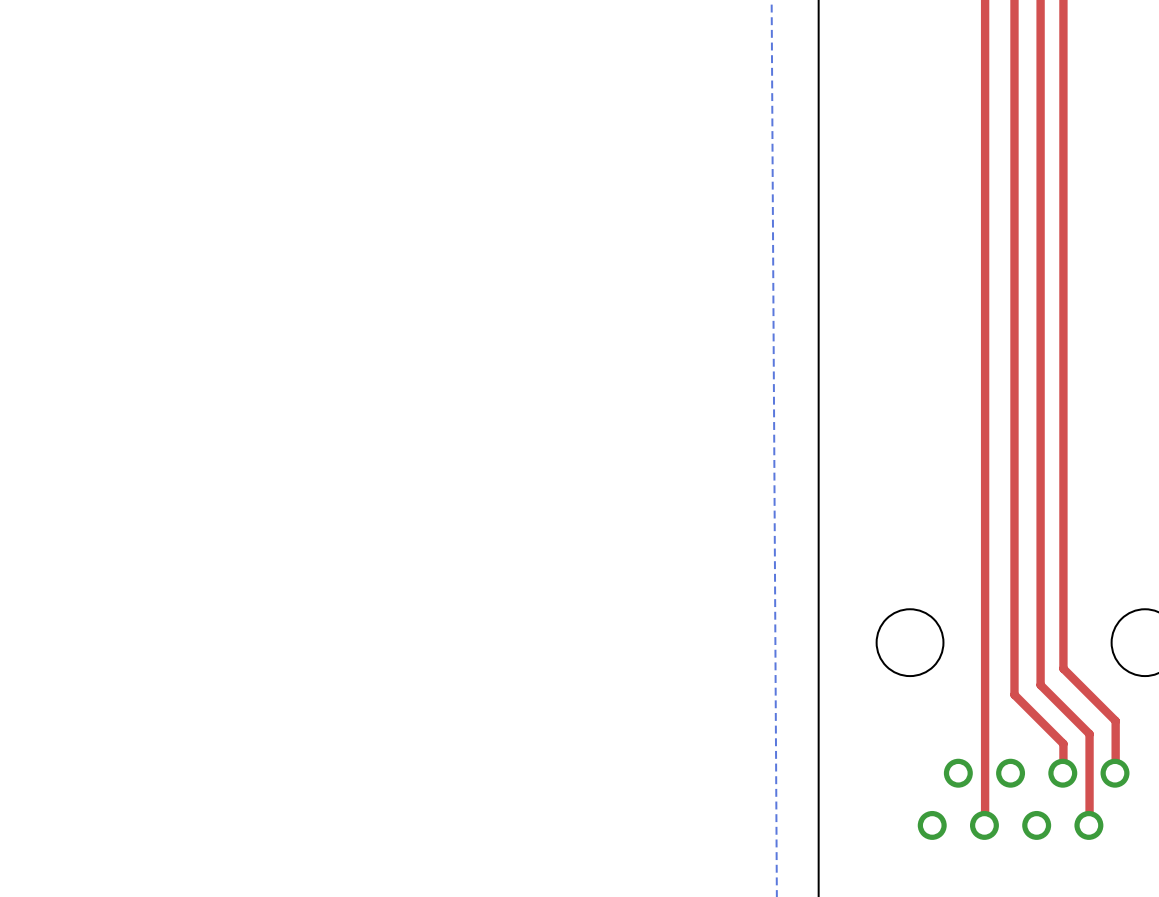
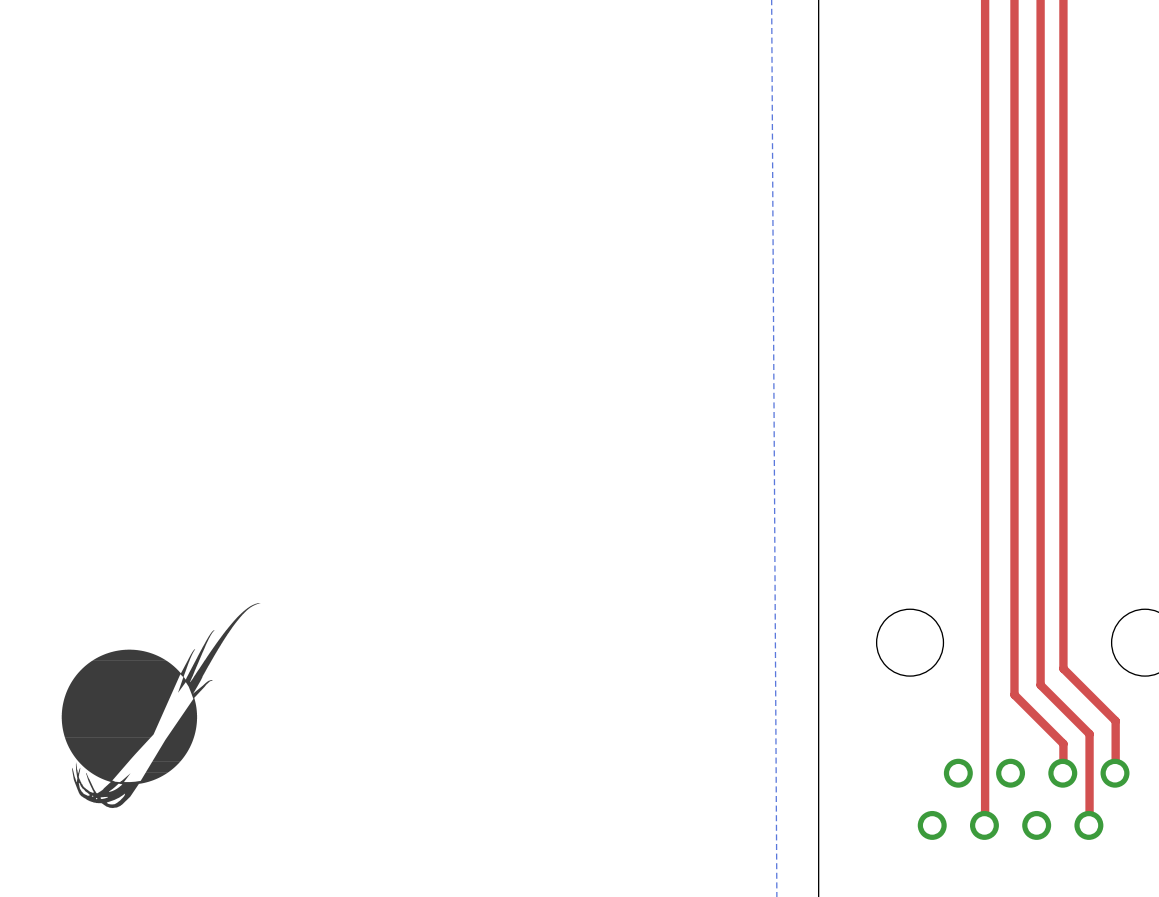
drawing: none -> [61, 603, 261, 809]

